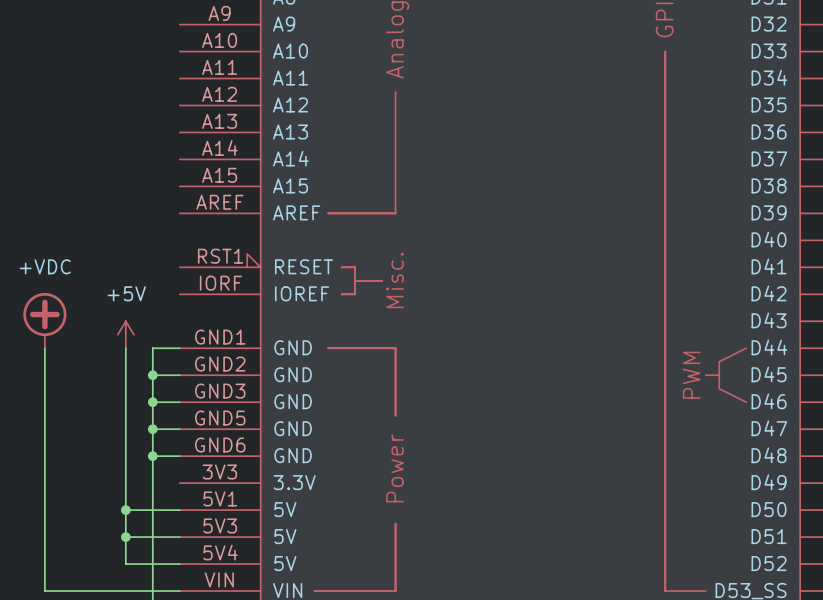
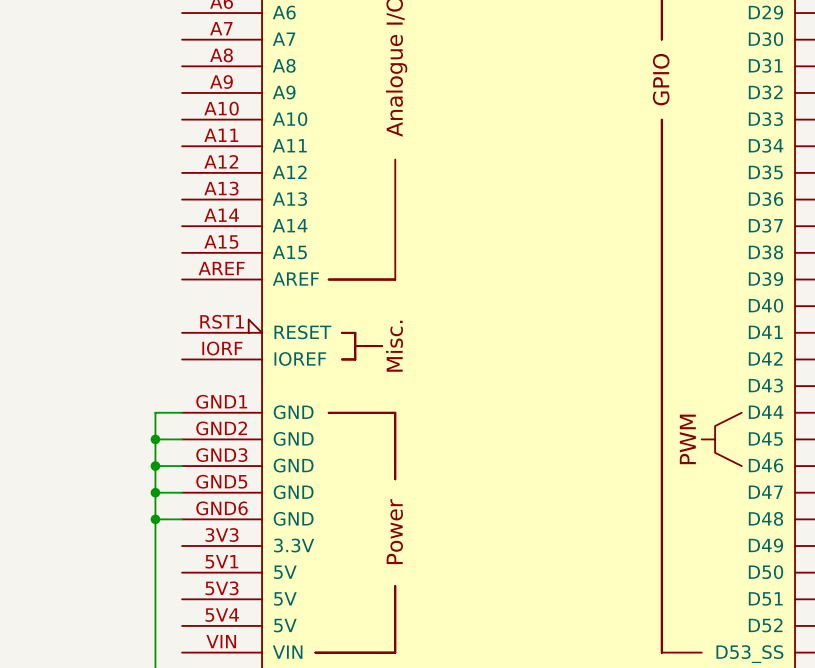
power symbol: +VDC (44, 320) -> none
power symbol: +5V (125, 334) -> none
wire: (44, 348) (44, 591) (179, 591) -> none
wire: (125, 348) (125, 564) (179, 564) -> none
wire: (125, 510) (179, 510) -> none
junction: (125, 510) -> none
wire: (125, 537) (179, 537) -> none
junction: (125, 537) -> none

